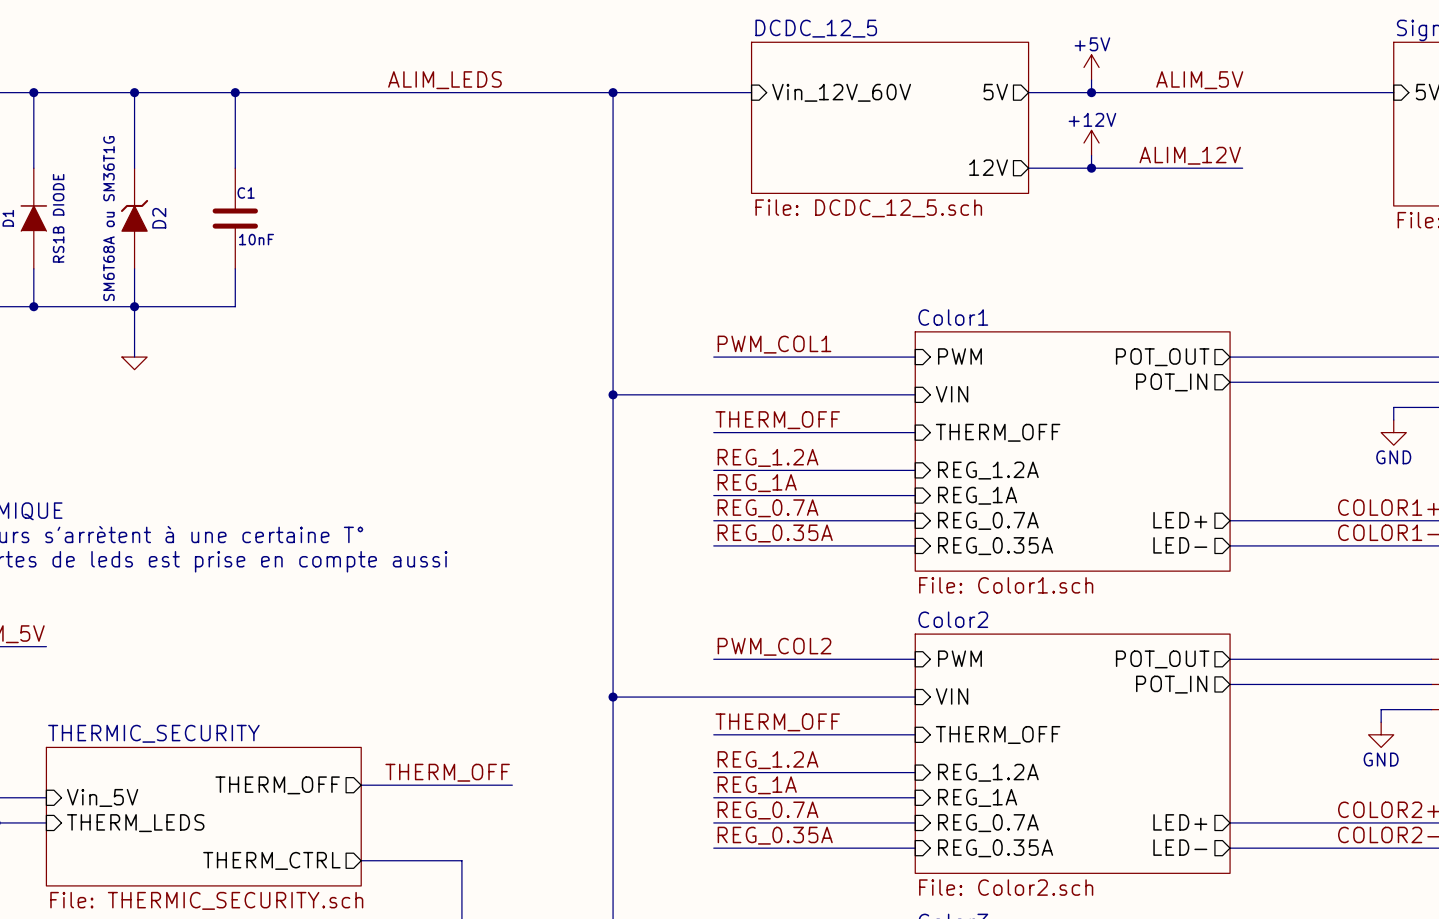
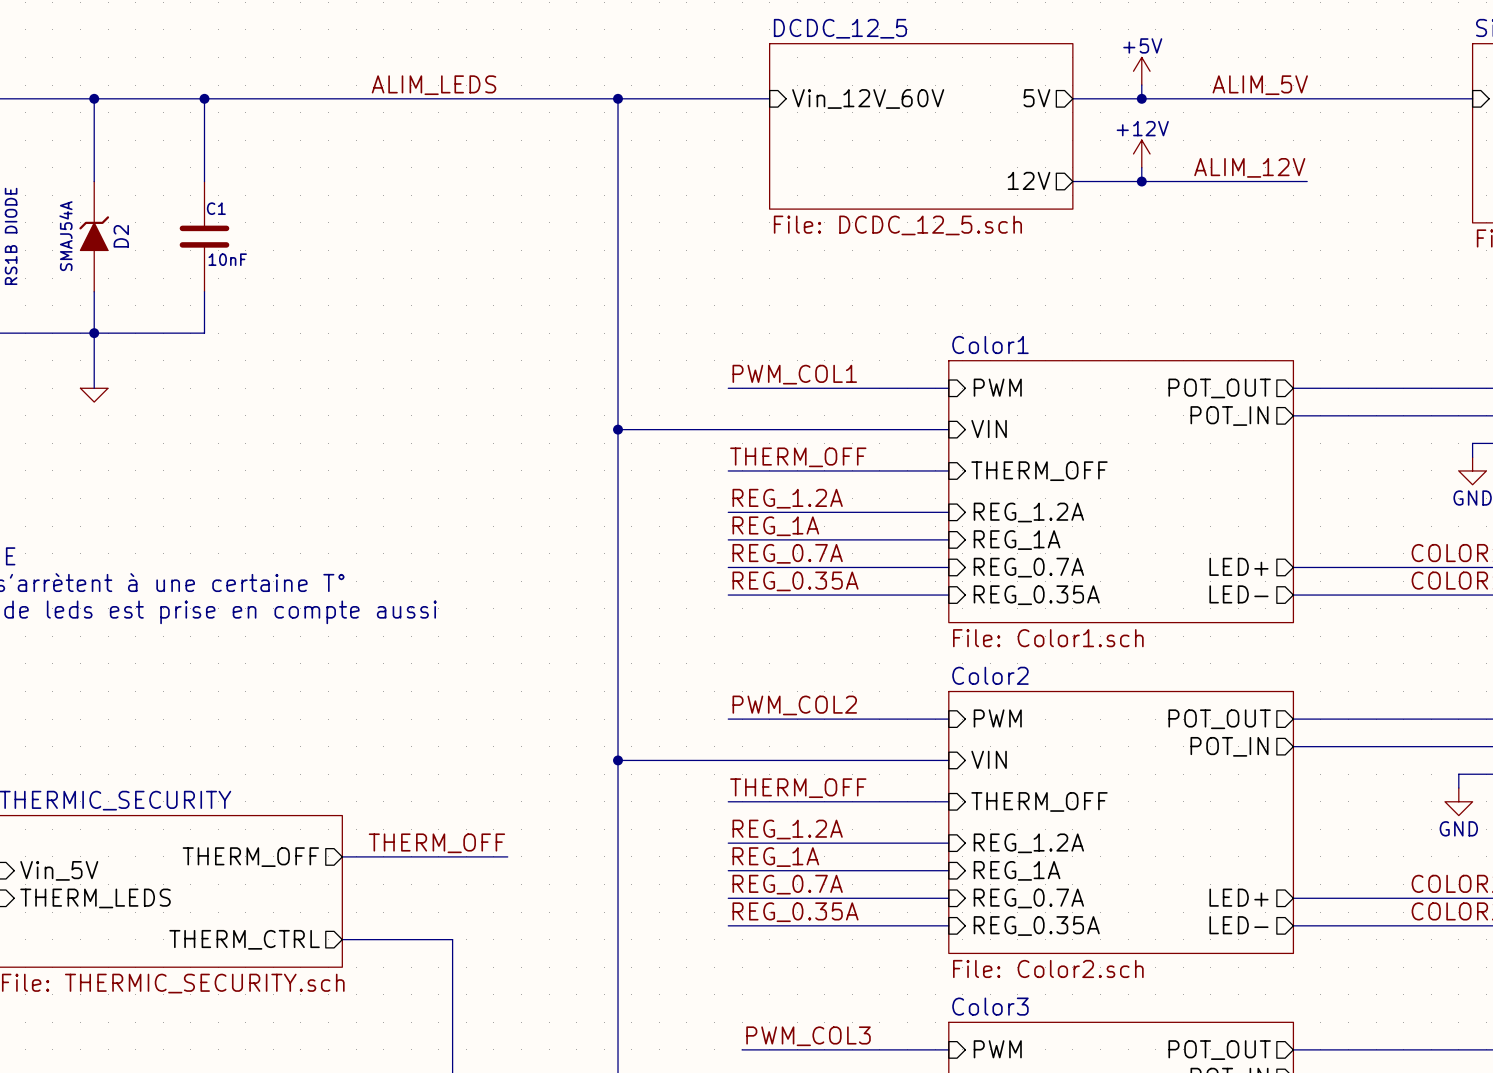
D2 value: SM6T68A ou SM36T1G (108, 218) -> SMAJ54A (65, 236)

